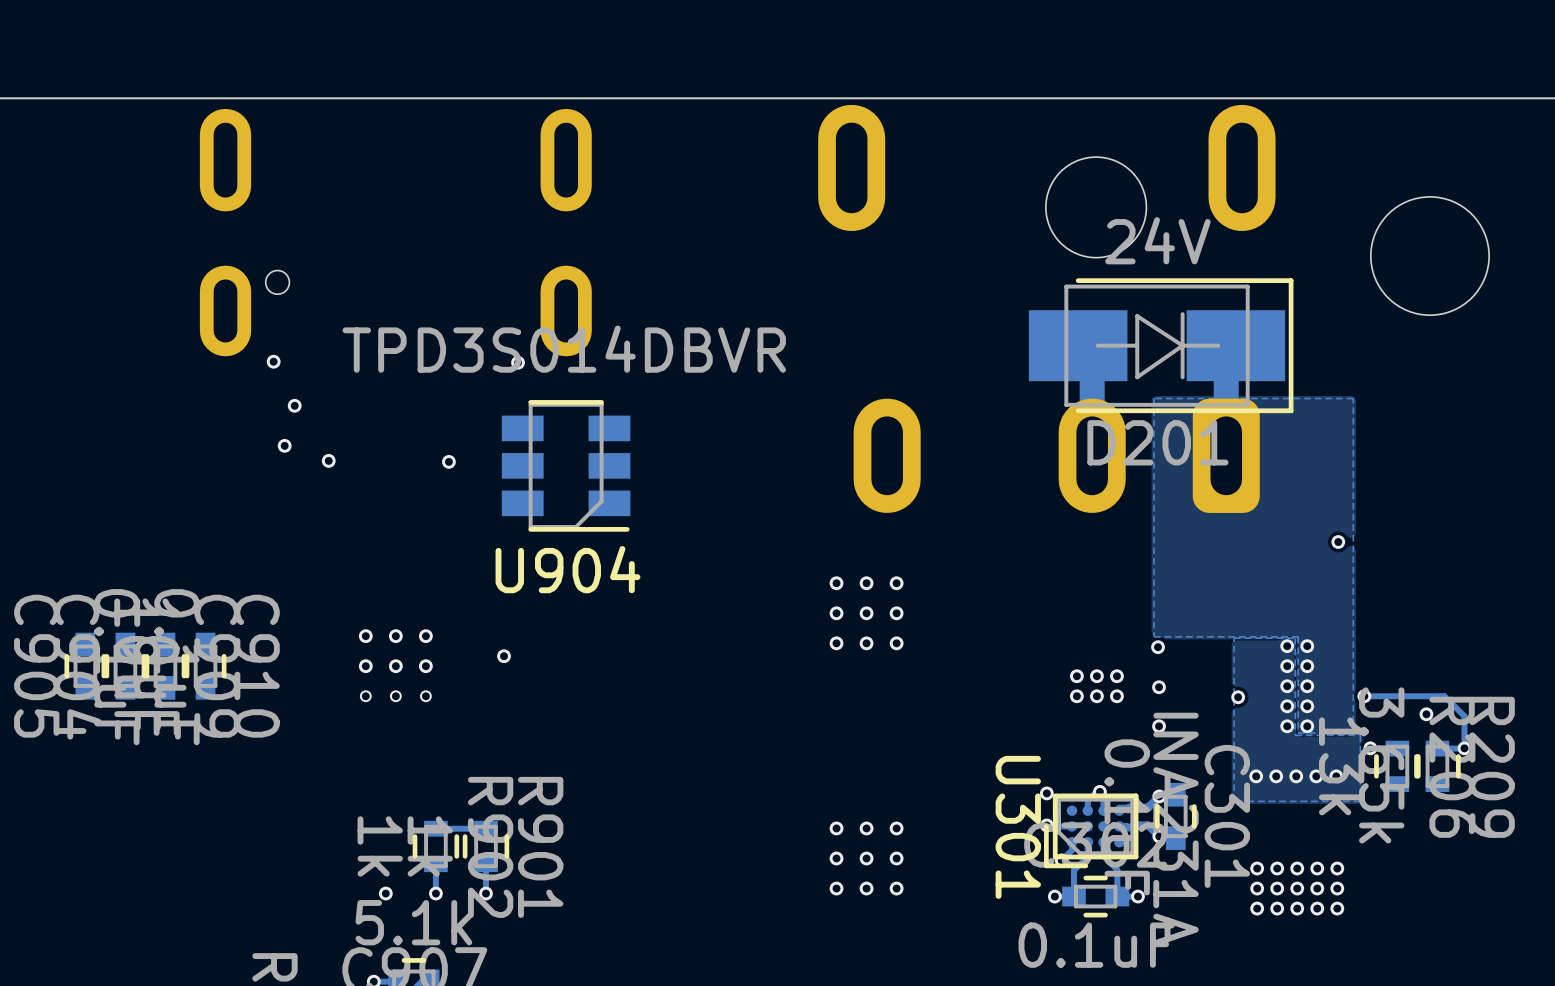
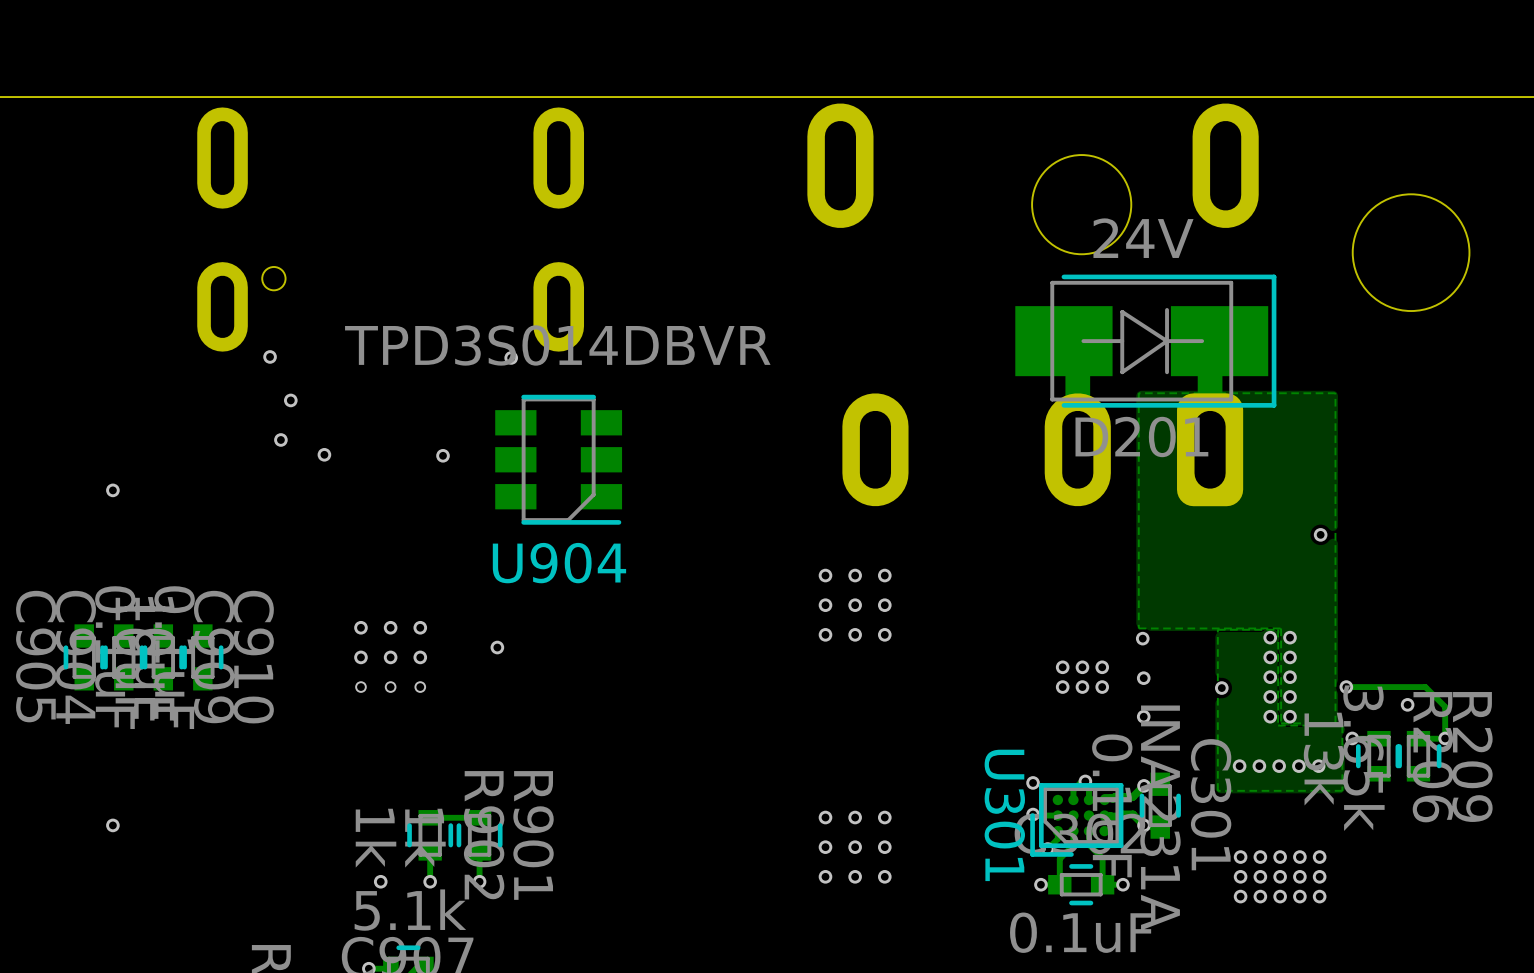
via: none -> (112, 490)
via: none -> (112, 825)

